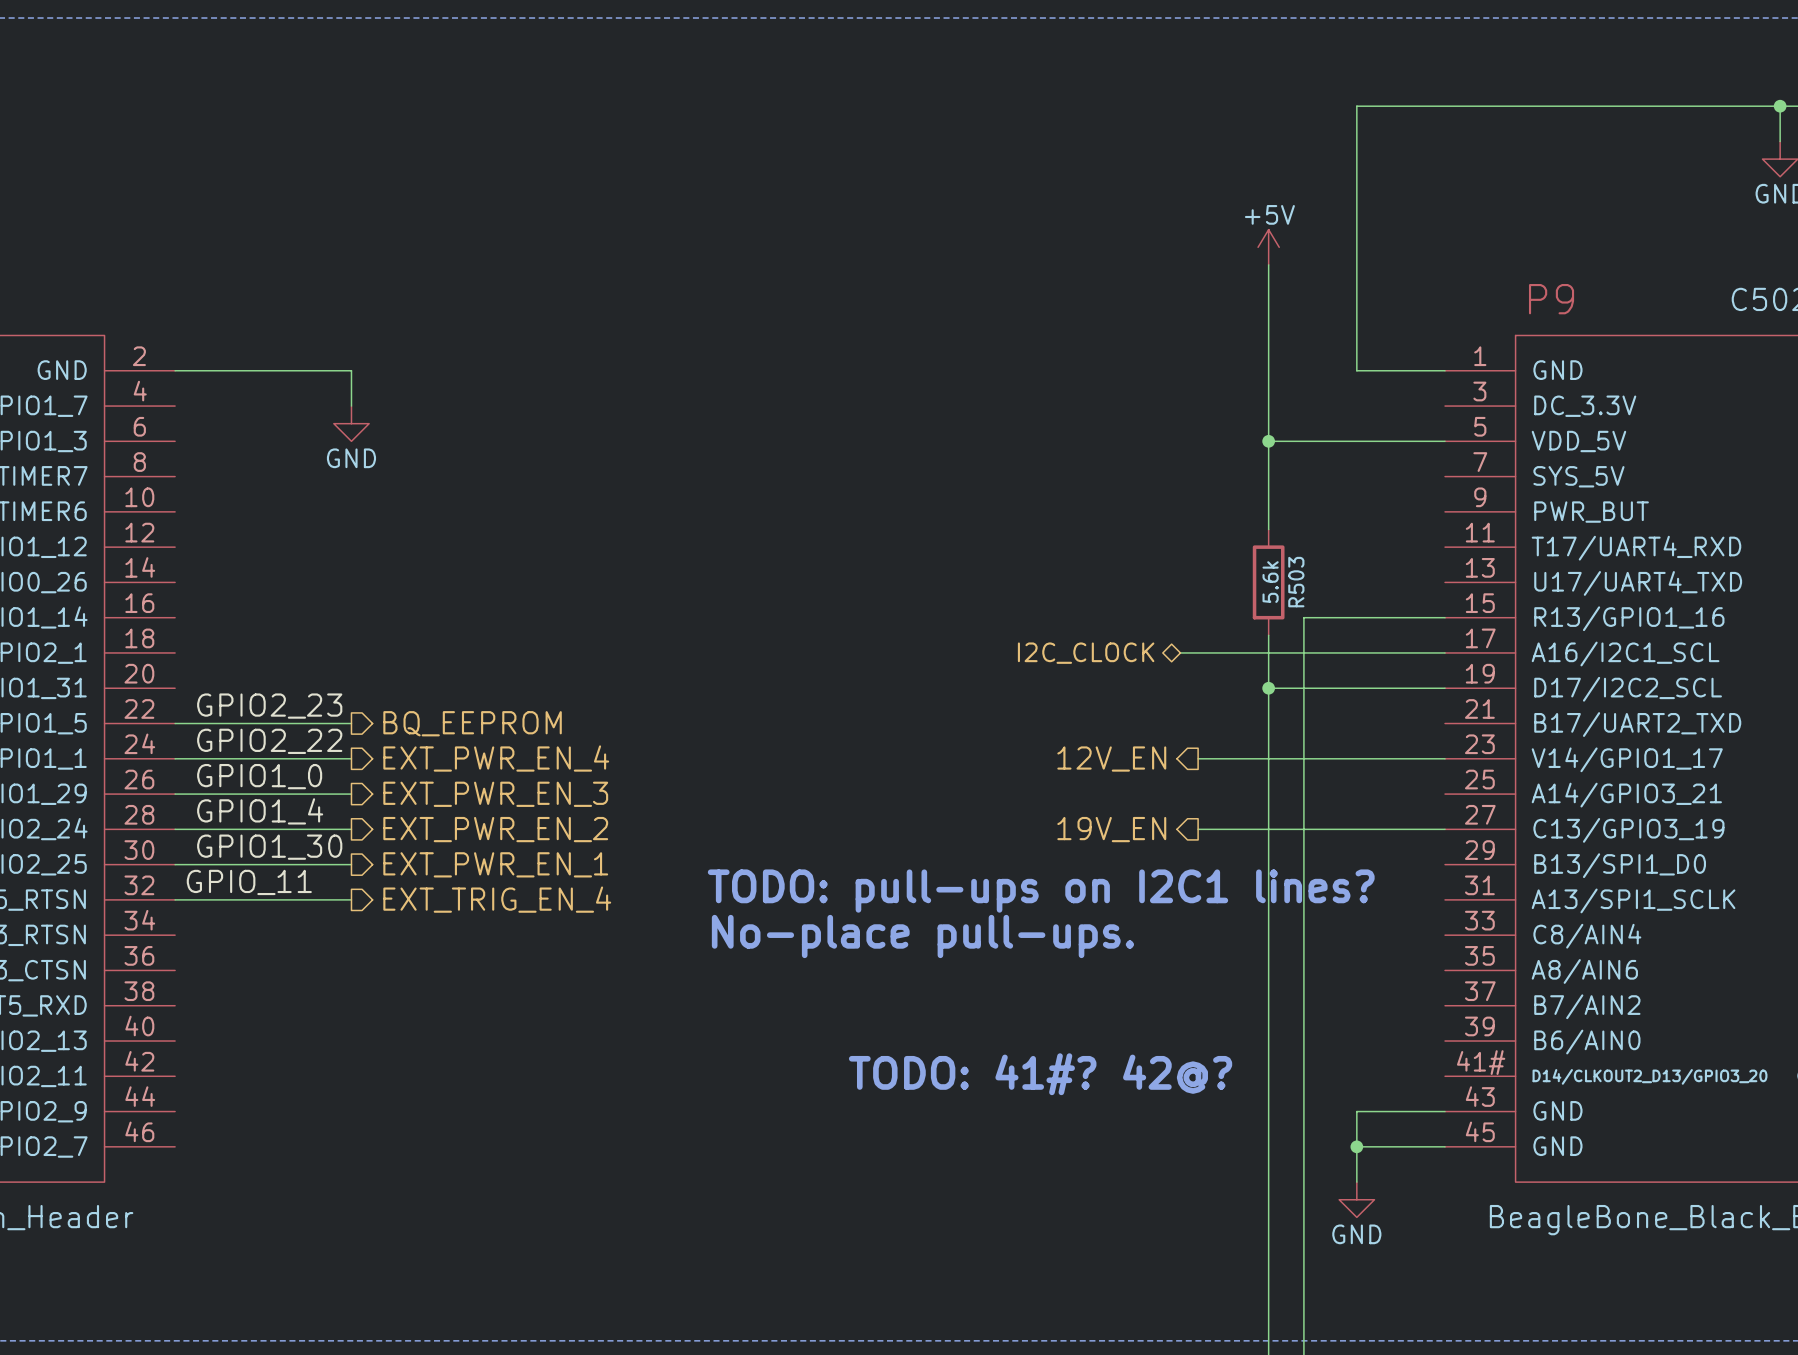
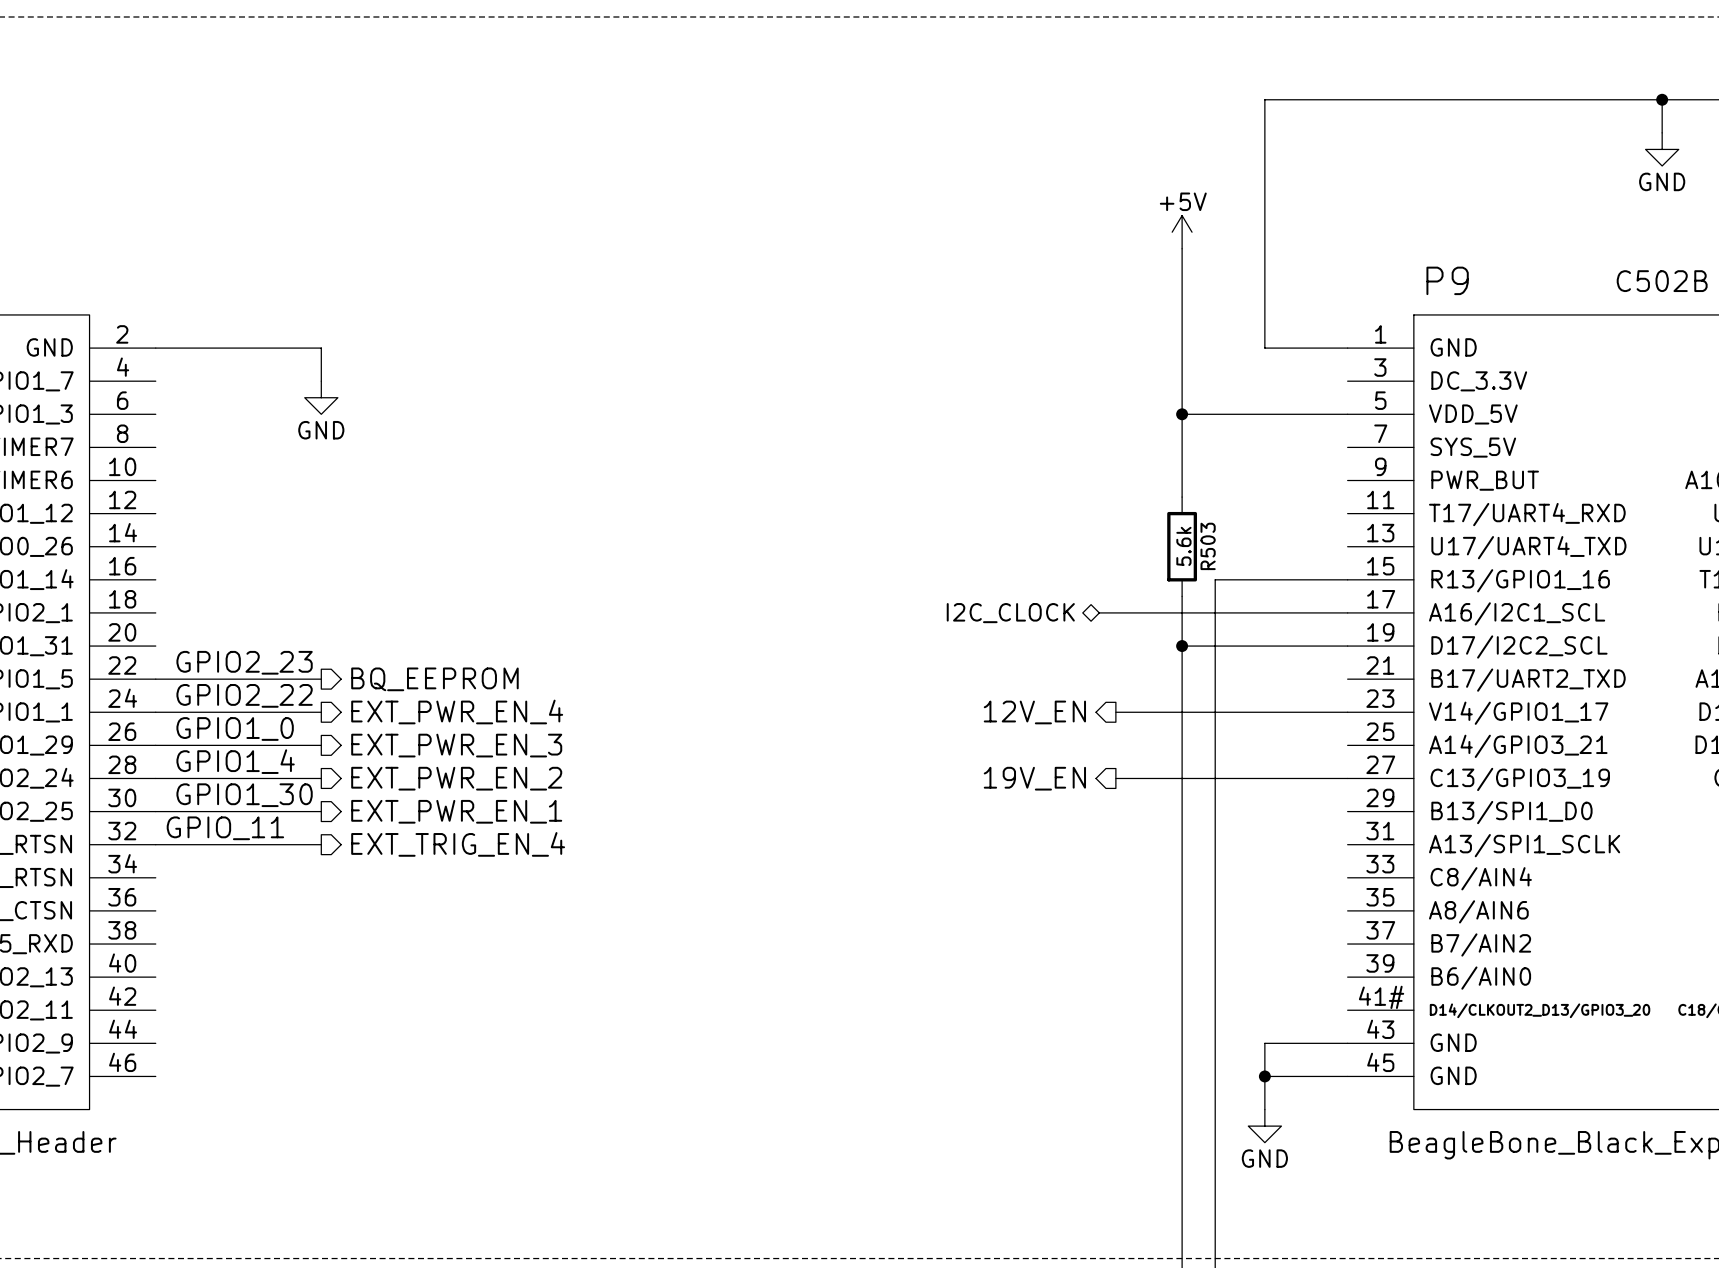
text: TODO: pull-ups on I2C1 lines? (1041, 891) -> none
text: No-place pull-ups. (922, 936) -> none
text: TODO: 41#? 42@? (1040, 1074) -> none

